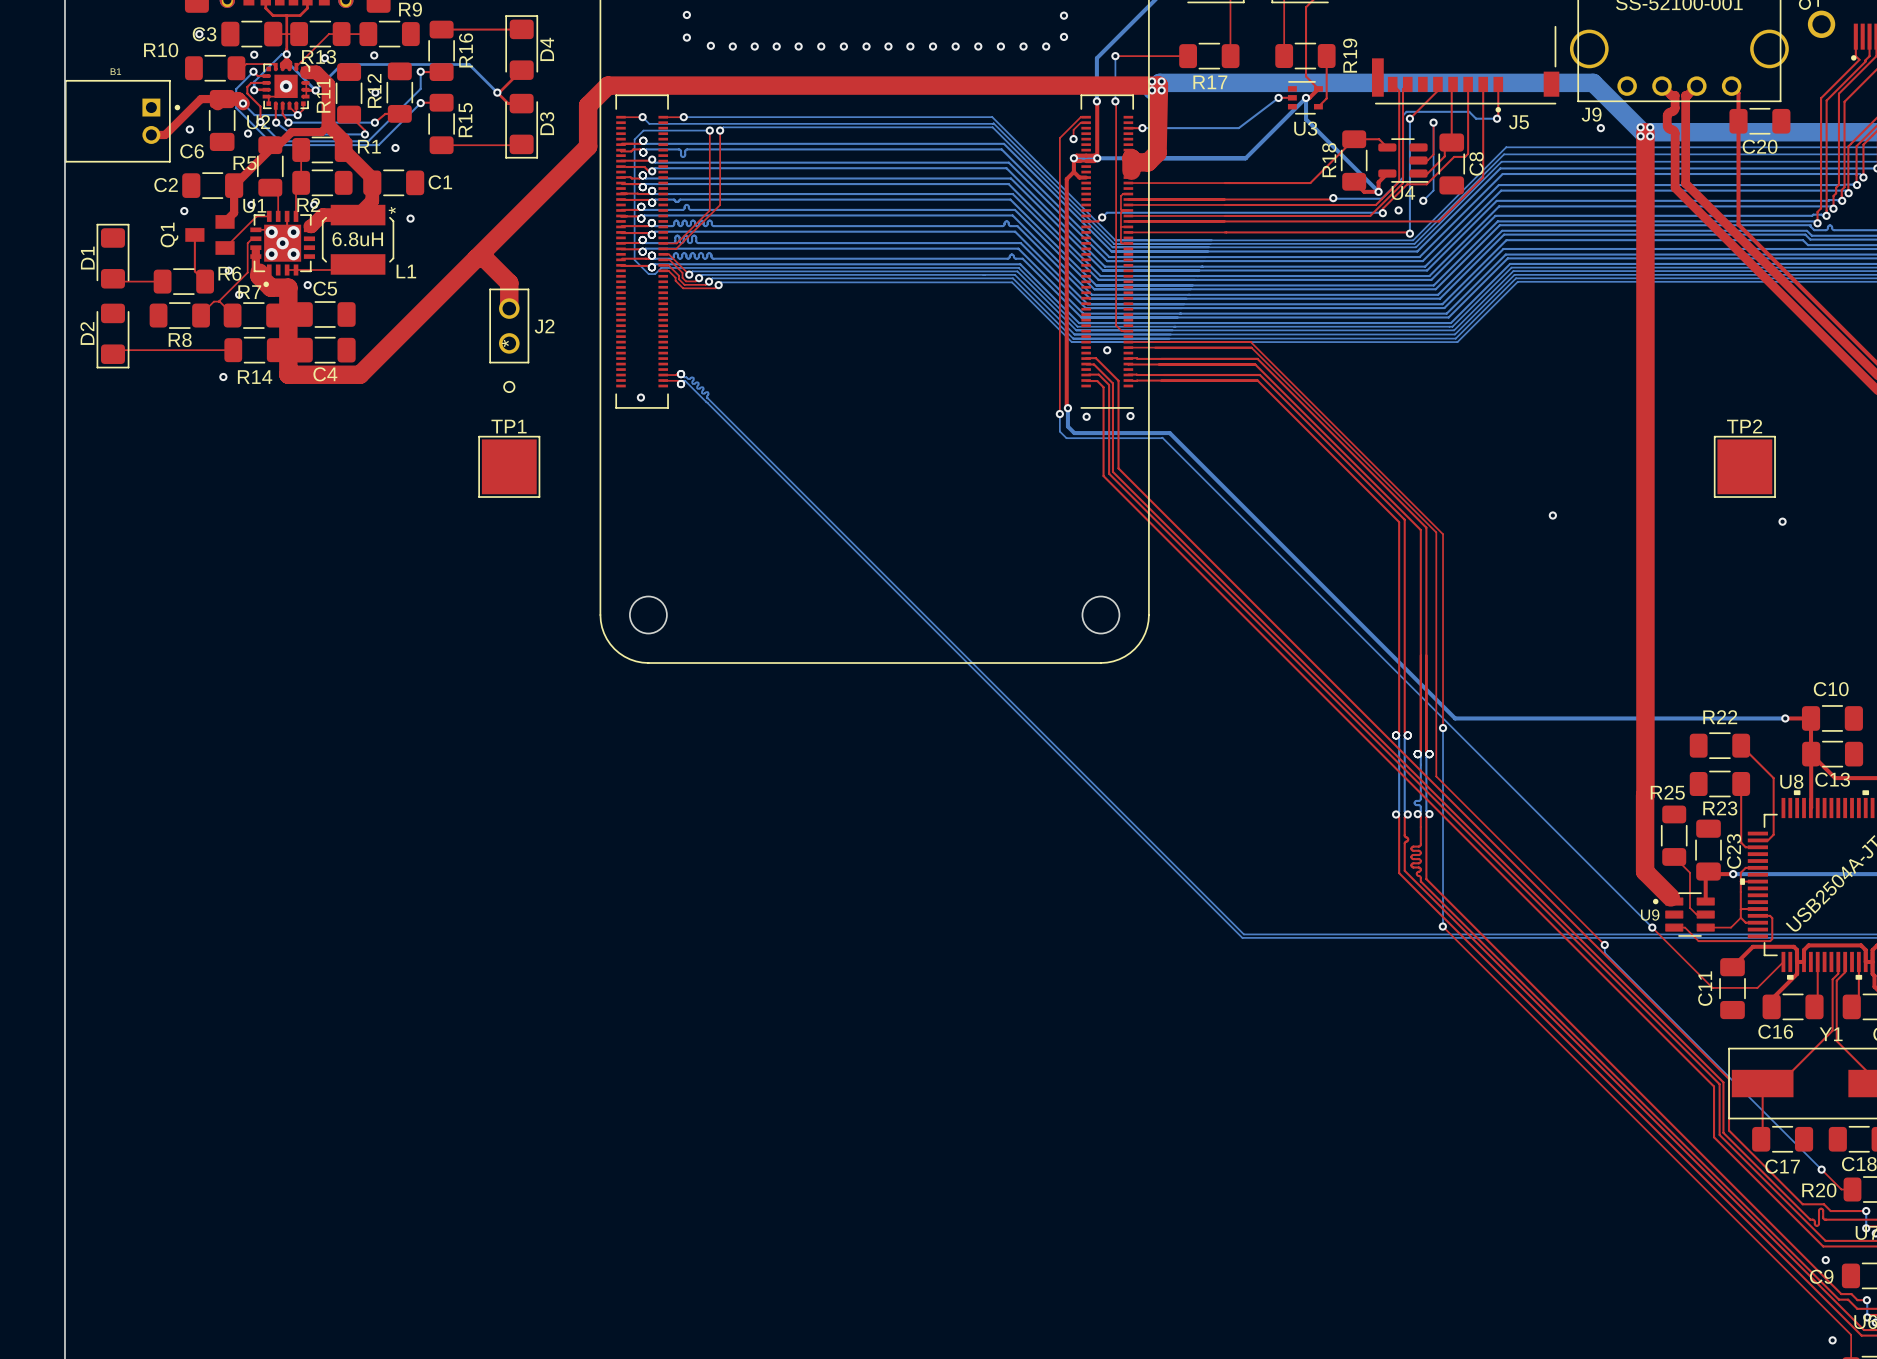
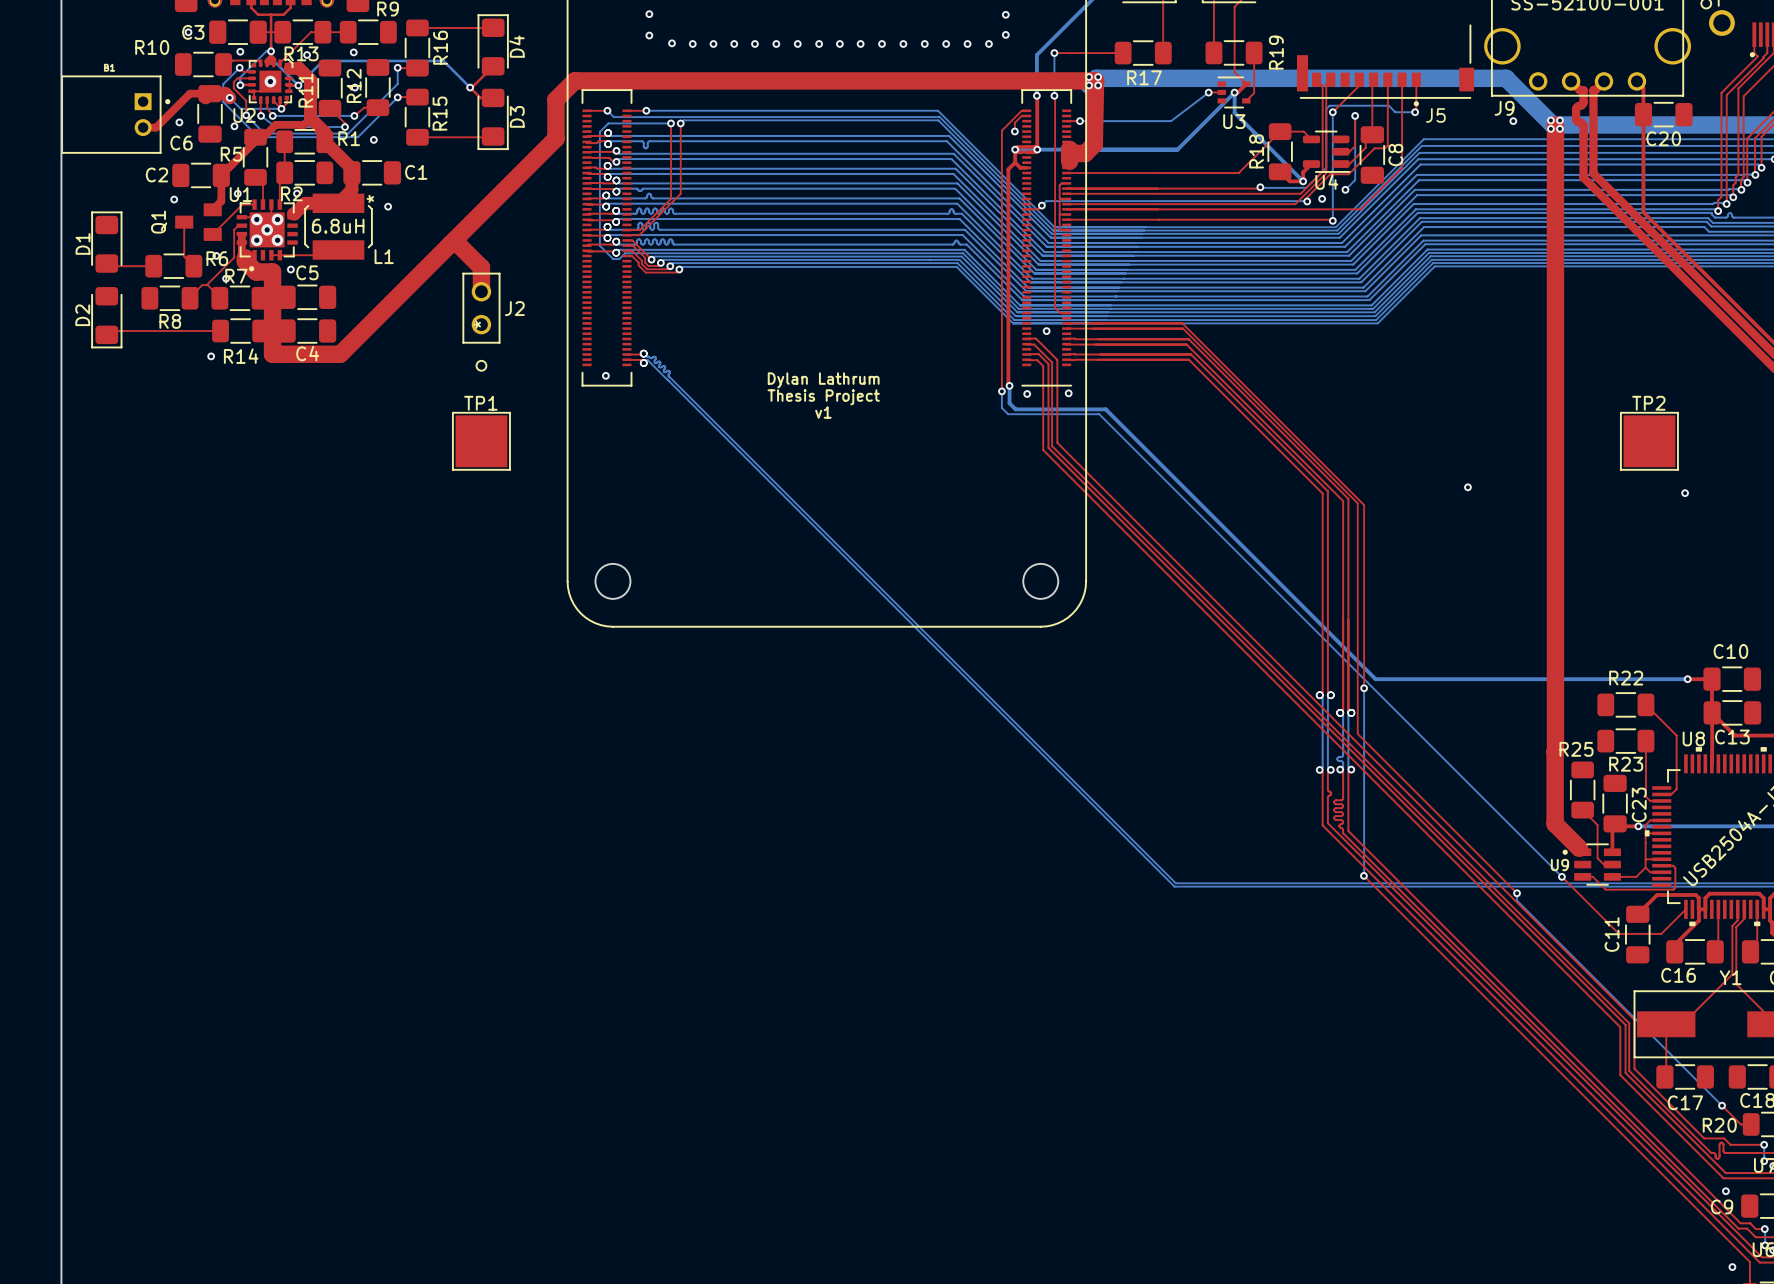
text: none -> Dylan Lathrum (823, 380)
text: none -> Thesis Project (823, 397)
text: none -> v1 (823, 412)

